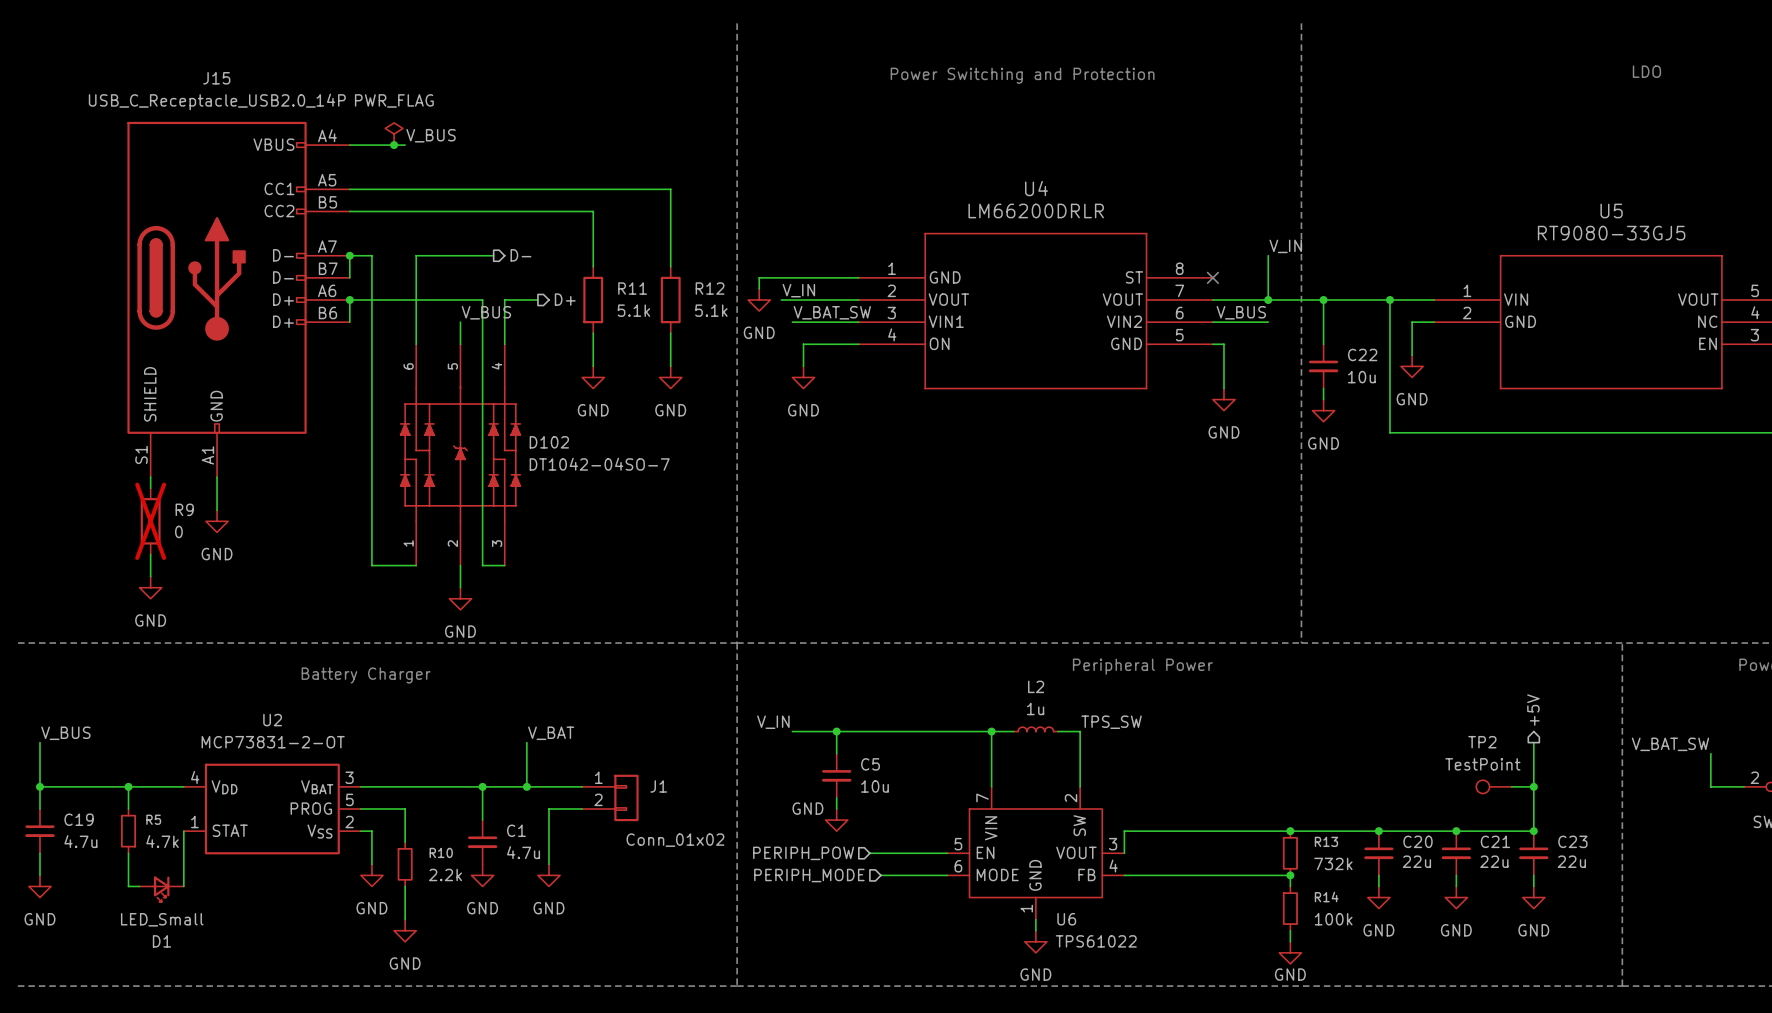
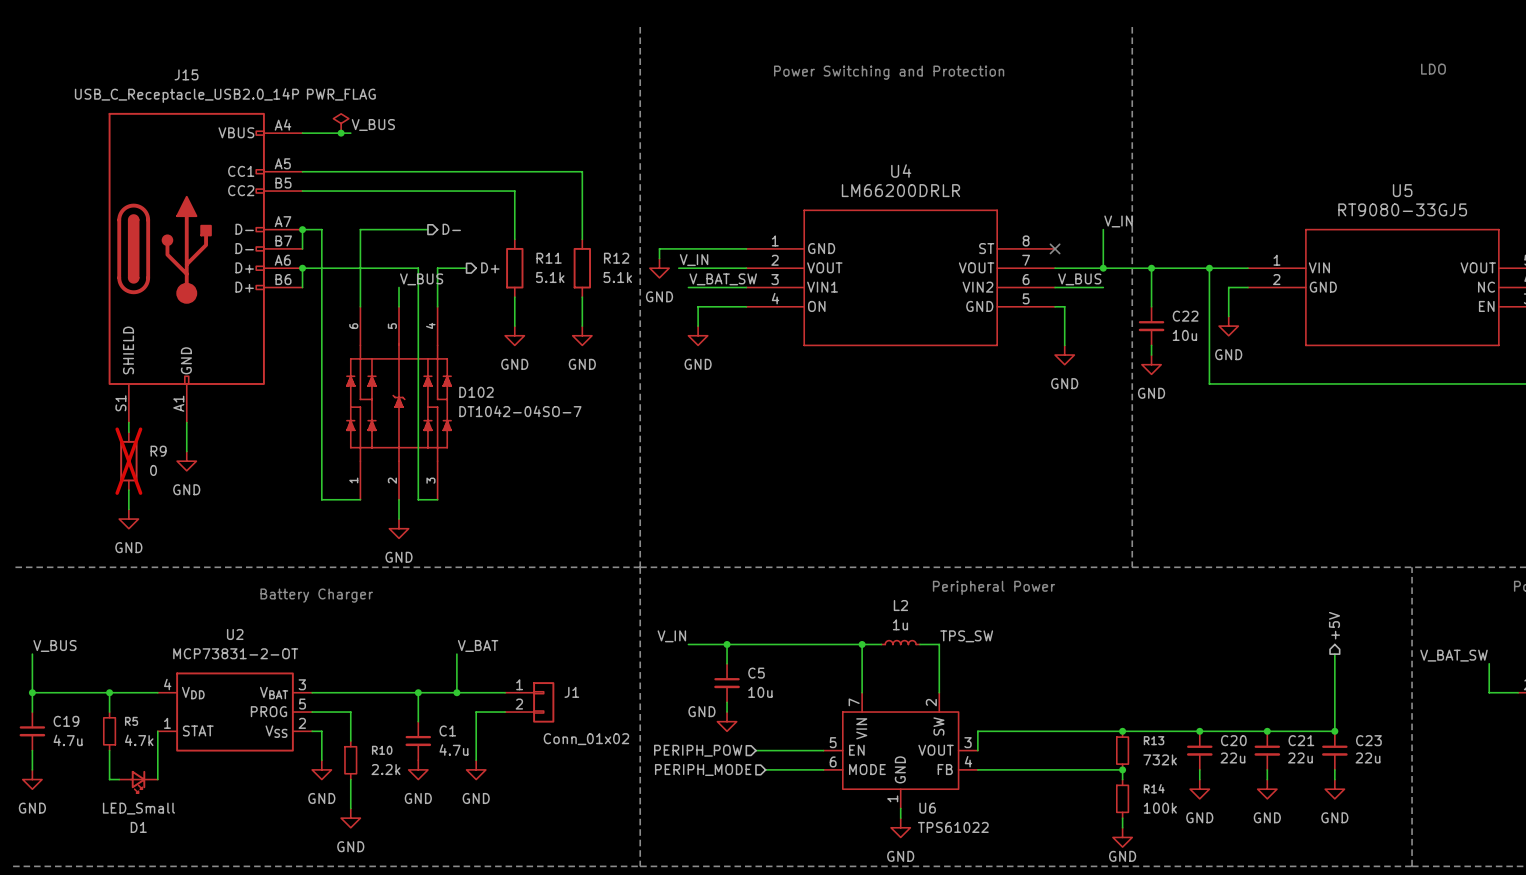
TP2: TestPoint (1493, 786) -> none
wire: (1511, 786) (1533, 786) -> none
junction: (1533, 786) -> none

